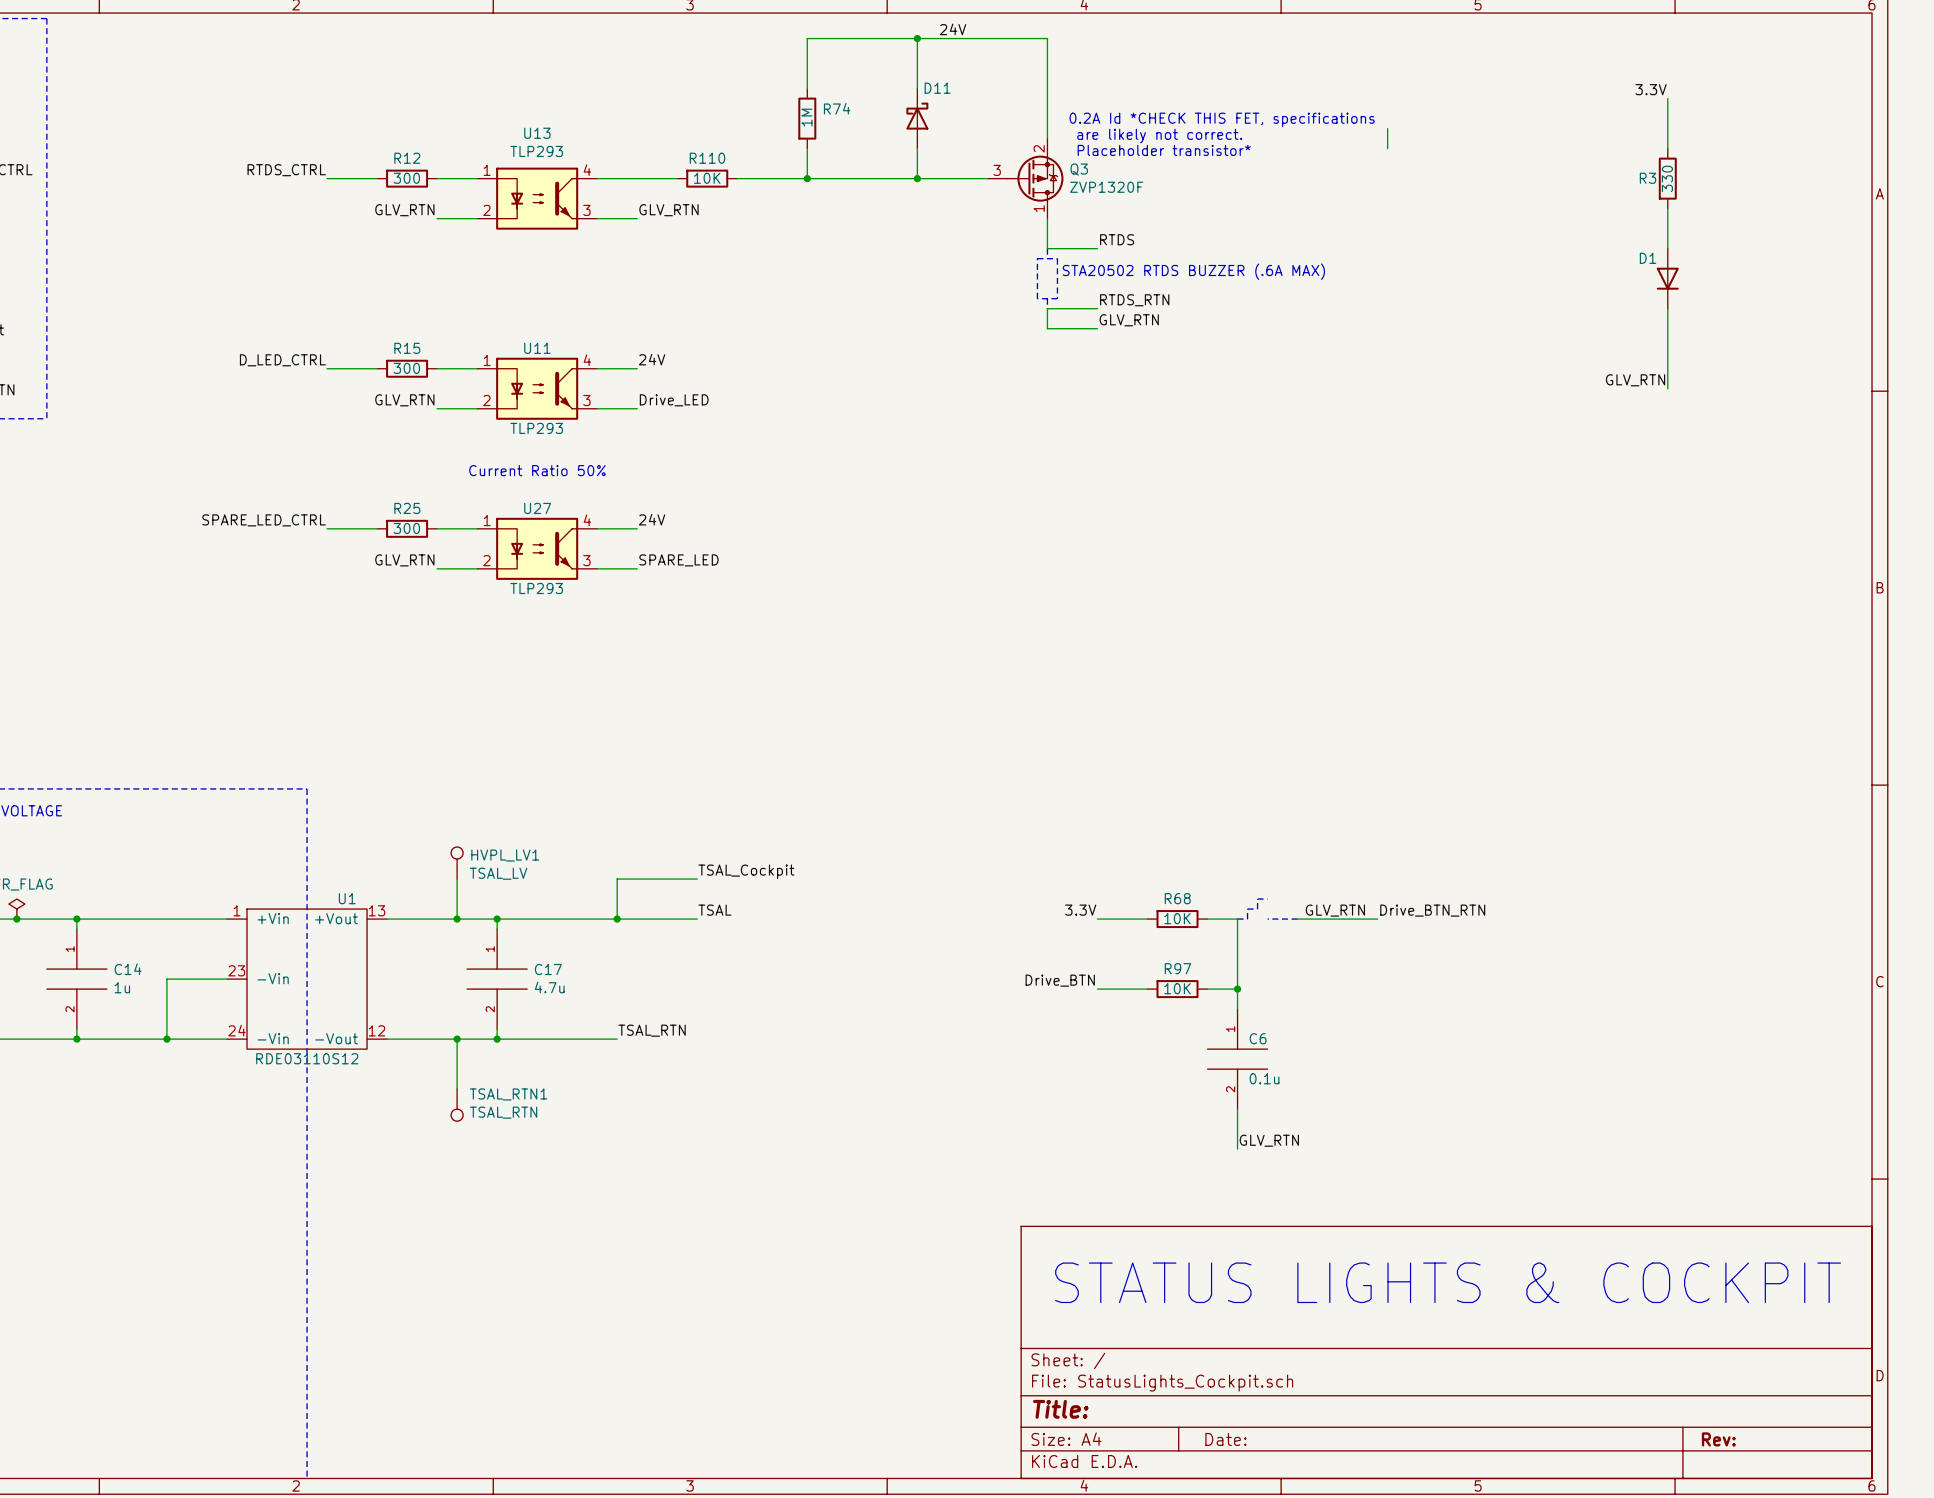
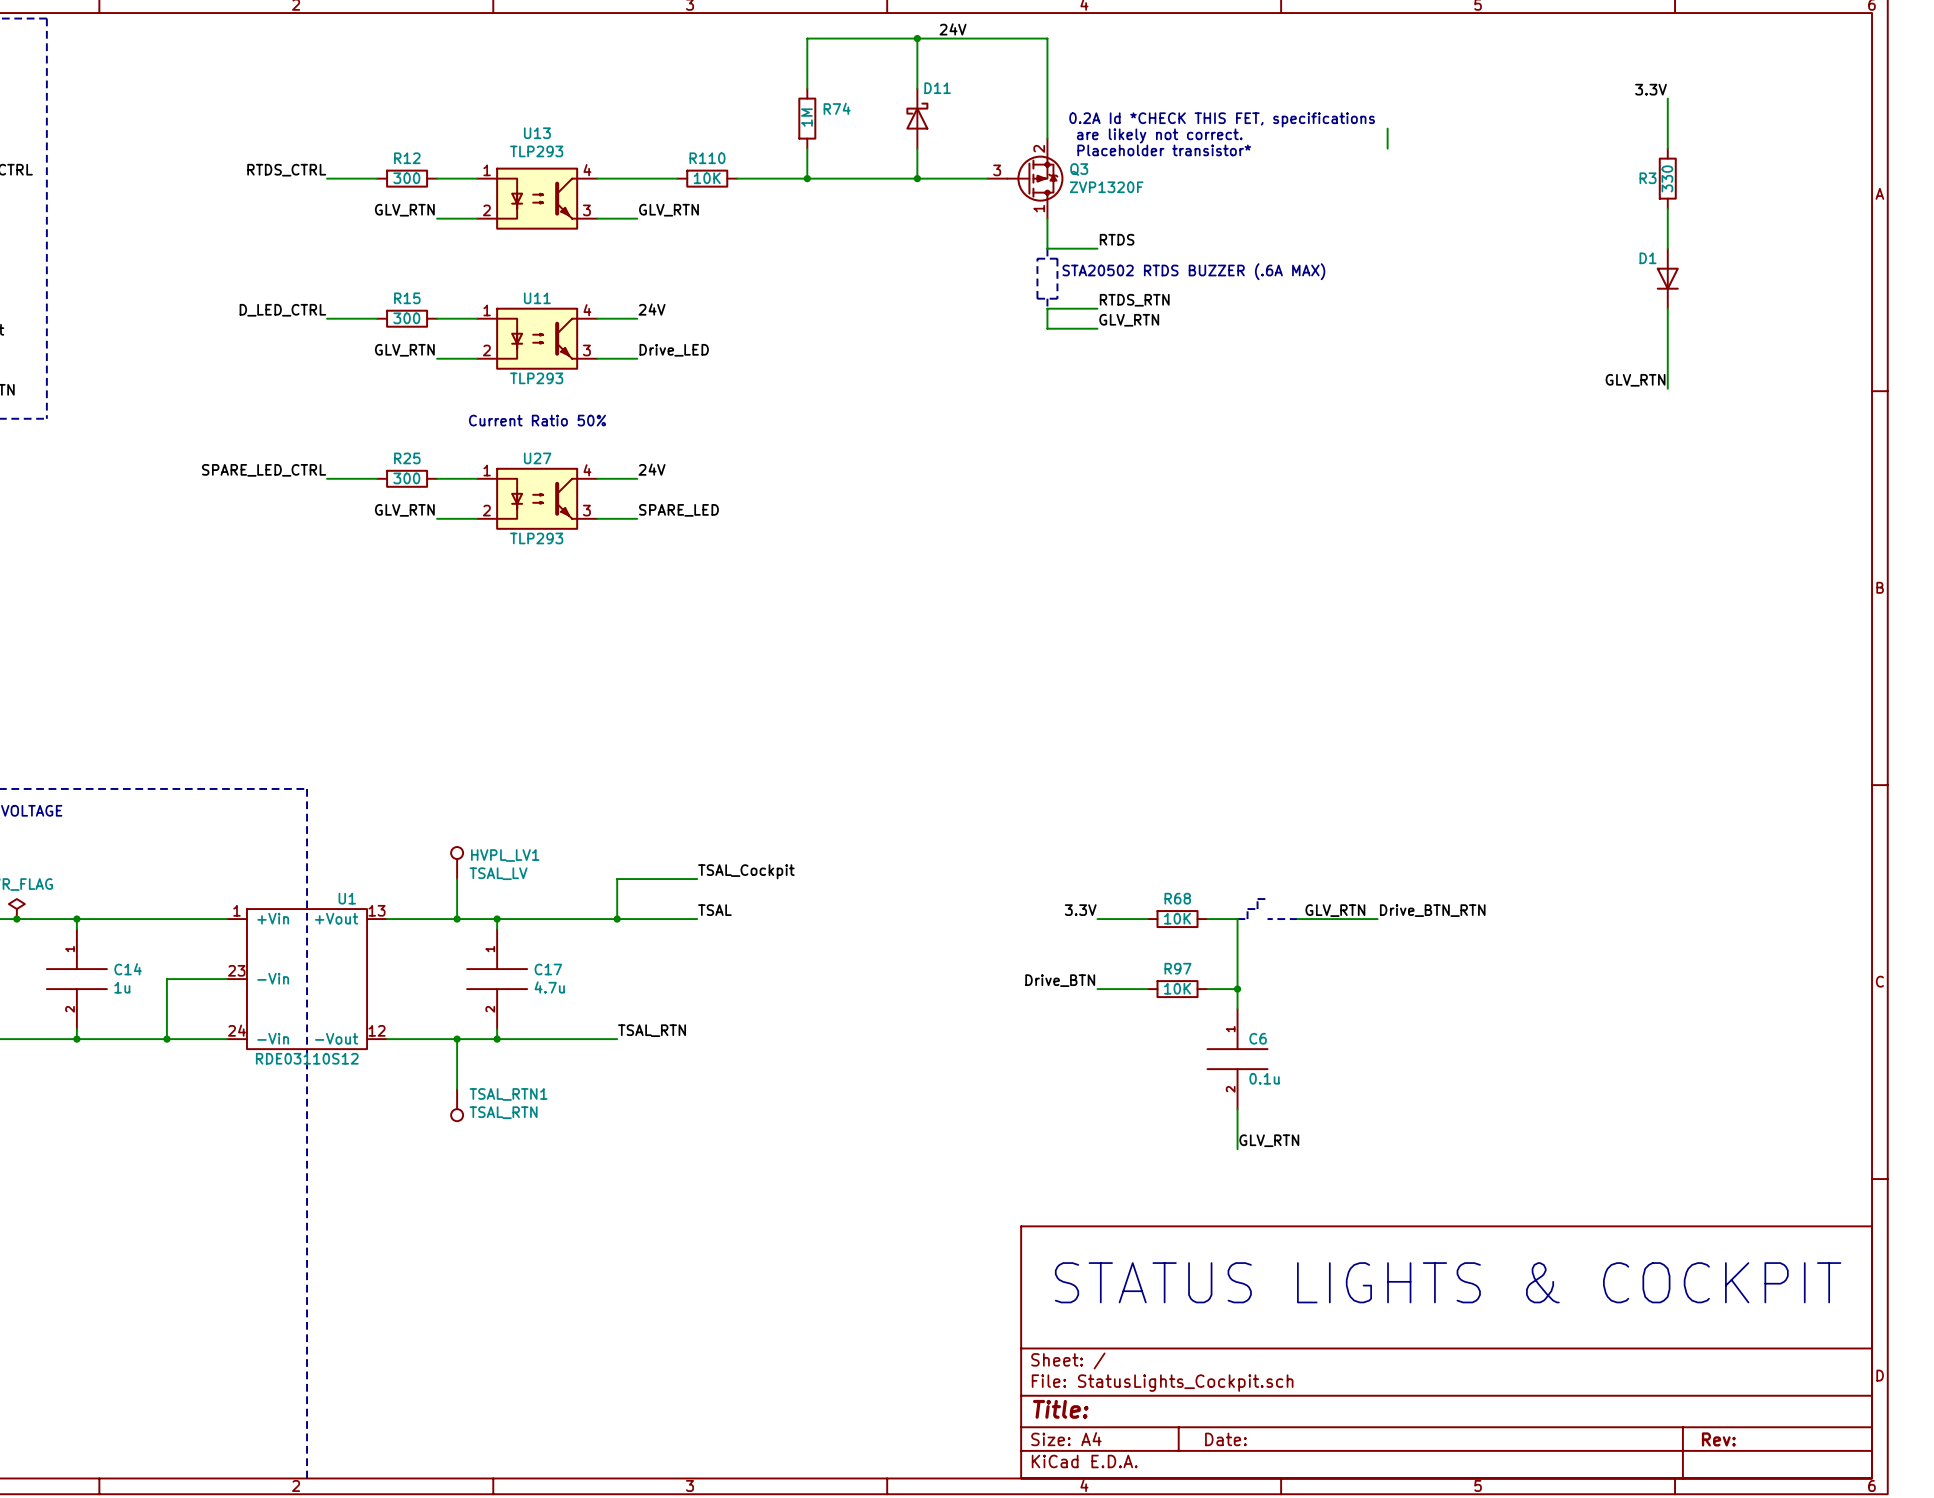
label position: 24V (652, 359) -> 24V (652, 309)
label position: D_LED_CTRL (282, 360) -> D_LED_CTRL (282, 310)
wire: (327, 368) (377, 368) -> (327, 318) (377, 318)
R15 position: (407, 368) -> (407, 318)
wire: (437, 368) (477, 368) -> (437, 318) (477, 318)
wire: (597, 368) (637, 368) -> (597, 318) (637, 318)
U11 position: (537, 388) -> (537, 338)
label position: GLV_RTN (404, 400) -> GLV_RTN (404, 350)
label position: Drive_LED (674, 400) -> Drive_LED (674, 350)
wire: (437, 408) (477, 408) -> (437, 358) (477, 358)
wire: (597, 408) (637, 408) -> (597, 358) (637, 358)
text position: Current Ratio 50% (537, 470) -> Current Ratio 50% (537, 420)
label position: 24V (652, 519) -> 24V (652, 469)
label position: SPARE_LED_CTRL (264, 520) -> SPARE_LED_CTRL (264, 470)
wire: (327, 528) (377, 528) -> (327, 478) (377, 478)
R25 position: (407, 528) -> (407, 478)
wire: (437, 528) (477, 528) -> (437, 478) (477, 478)
wire: (597, 528) (637, 528) -> (597, 478) (637, 478)
U27 position: (537, 548) -> (537, 498)
label position: GLV_RTN (404, 560) -> GLV_RTN (404, 510)
label position: SPARE_LED (678, 560) -> SPARE_LED (678, 510)
wire: (437, 568) (477, 568) -> (437, 518) (477, 518)
wire: (597, 568) (637, 568) -> (597, 518) (637, 518)

